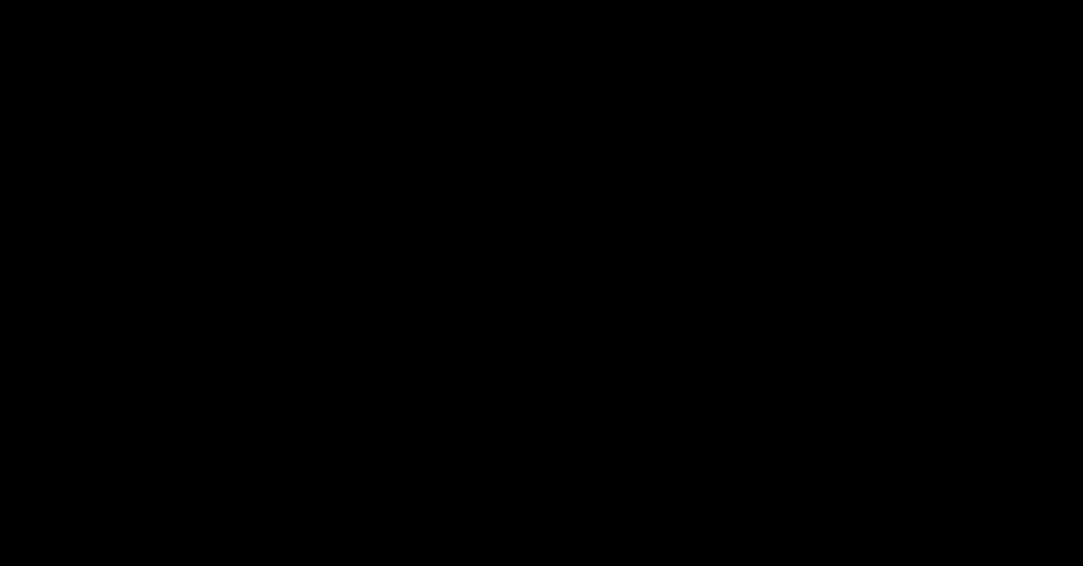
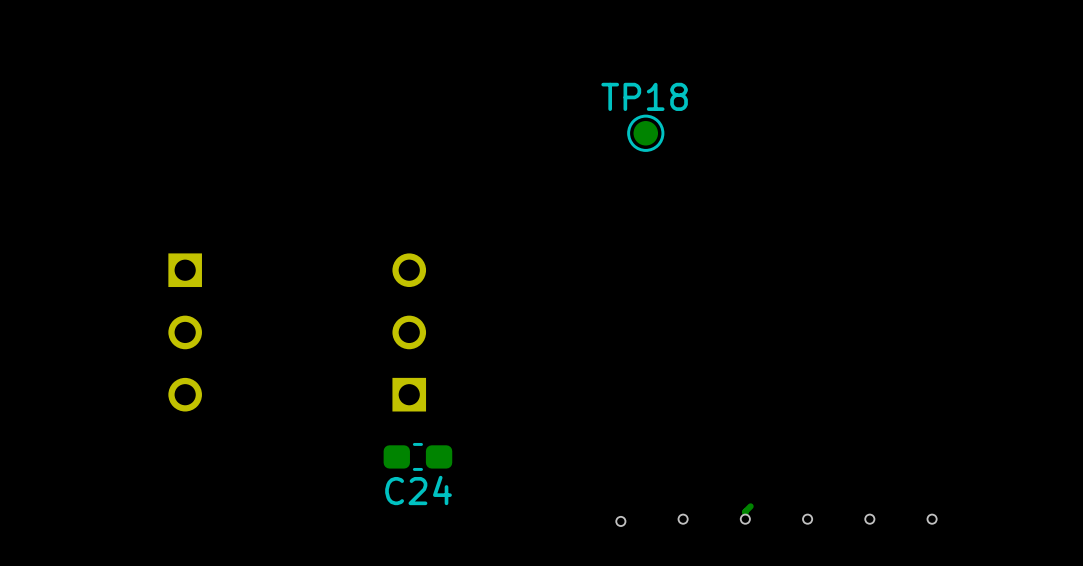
TP18: none -> (645, 133)
part: none -> (185, 332)
part: none -> (409, 332)
C24: none -> (417, 456)
track: none -> (750, 506) (745, 511) (745, 519)
via: none -> (683, 519)
via: none -> (745, 519)
via: none -> (807, 519)
via: none -> (869, 519)
via: none -> (932, 519)
via: none -> (620, 521)

